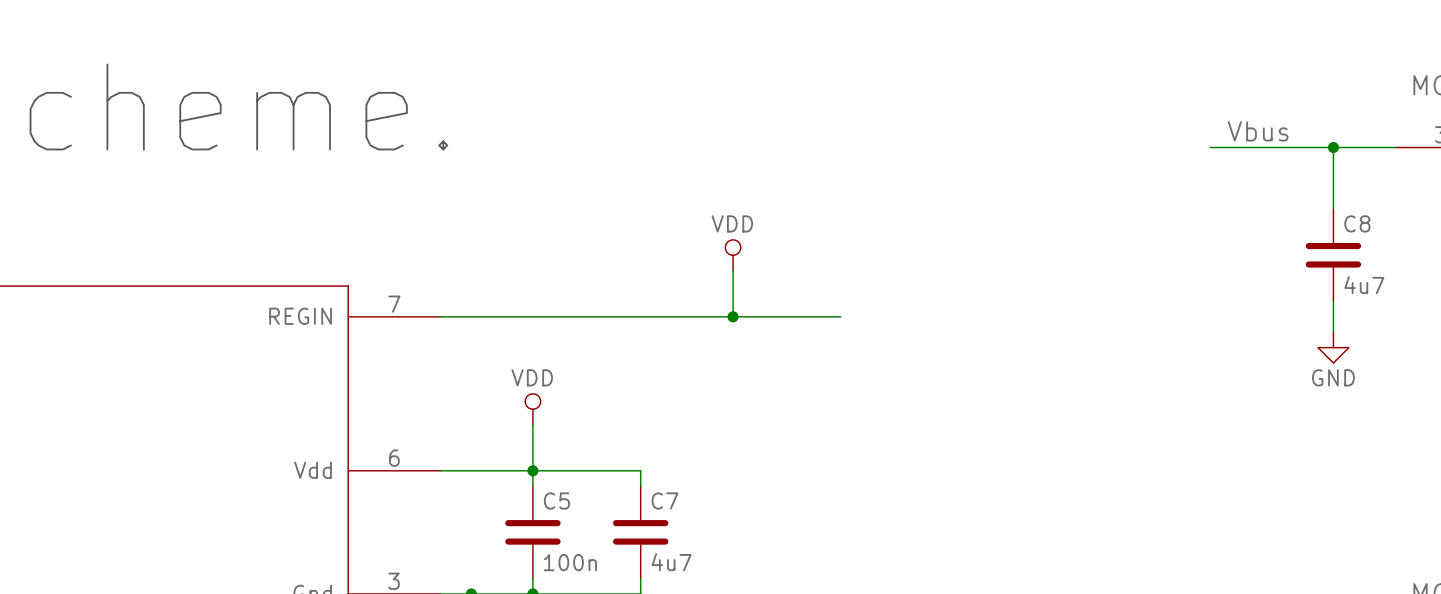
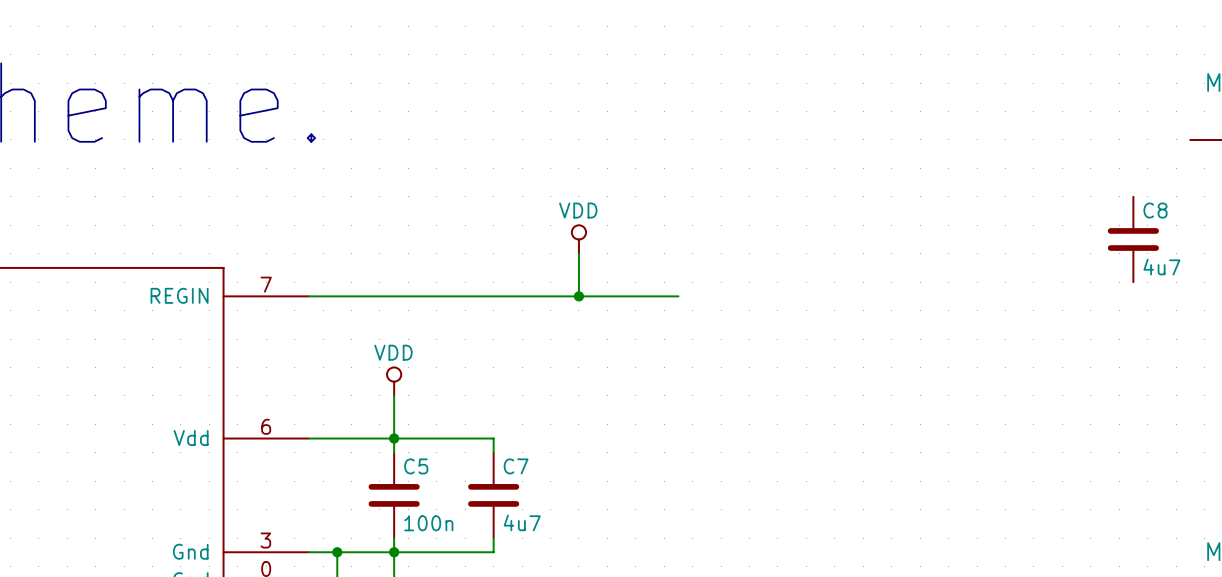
label: Vbus (1258, 131) -> none
wire: (1210, 147) (1395, 147) -> none
wire: (1333, 147) (1333, 209) -> none
junction: (1333, 147) -> none
wire: (1333, 301) (1333, 332) -> none
power symbol: GND (1333, 347) -> none

